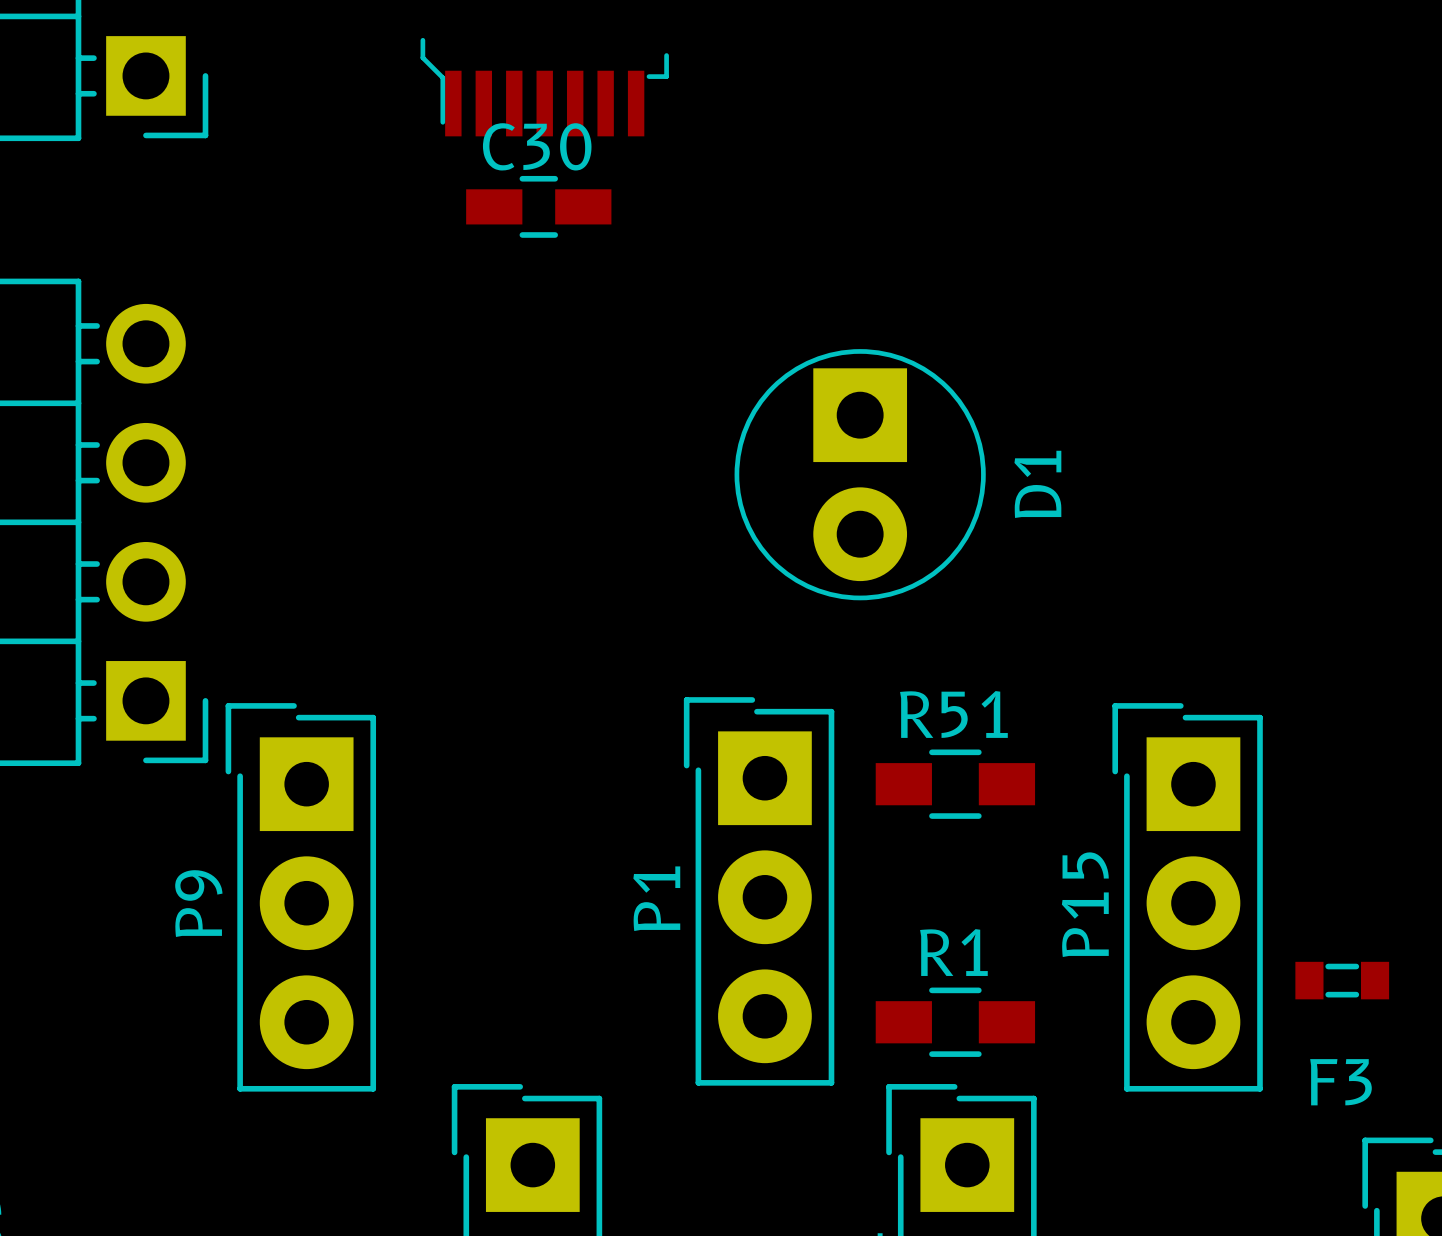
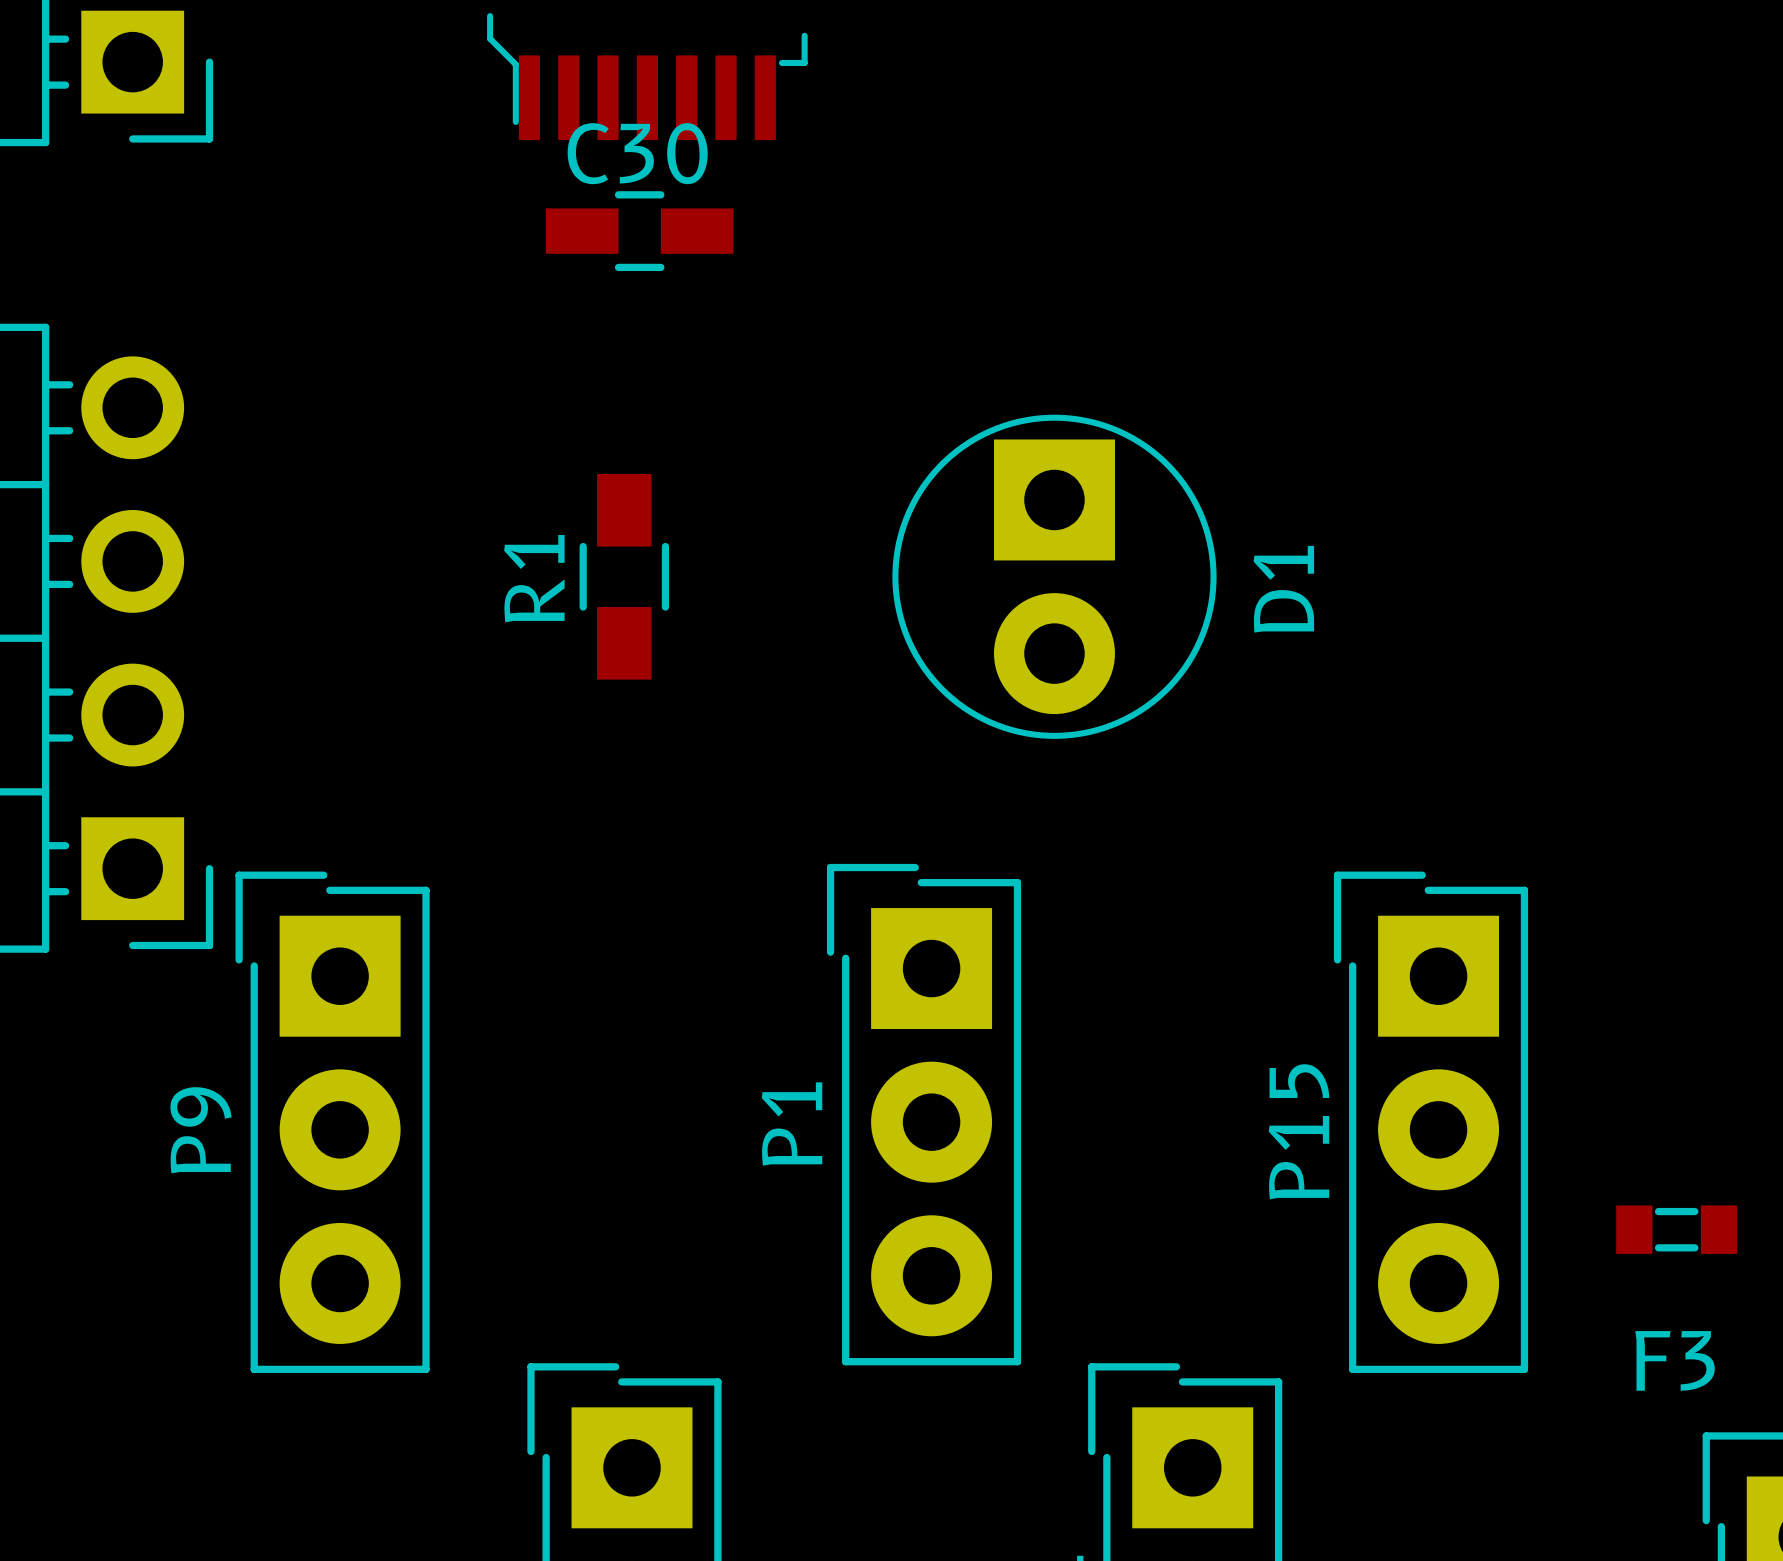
R51: (955, 784) -> none
P15 position: (1187, 897) -> (1430, 1122)
R1 name position: R1 (953, 952) -> R1 (534, 578)
R1 rotation: 0° (955, 1022) -> 90° clockwise (624, 576)
R1 position: (955, 1022) -> (624, 576)

